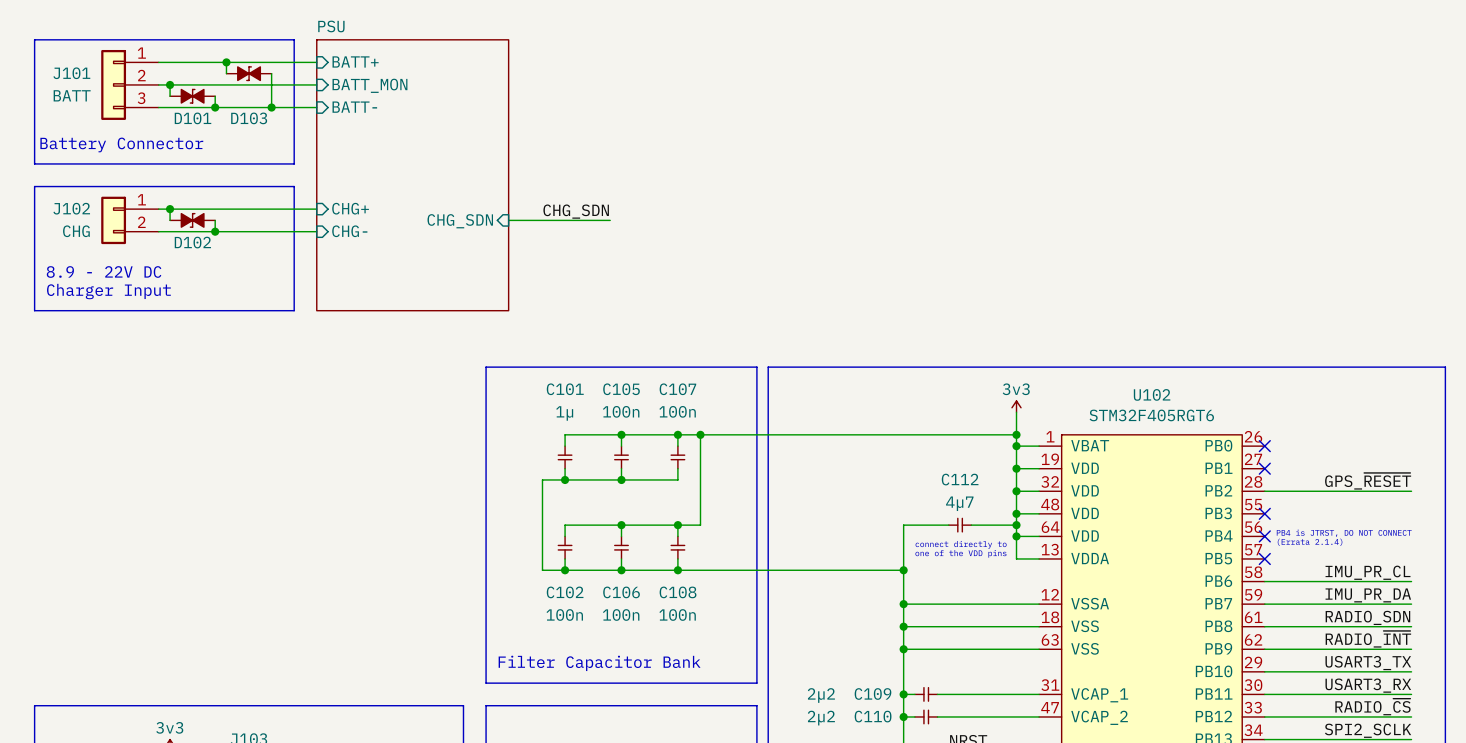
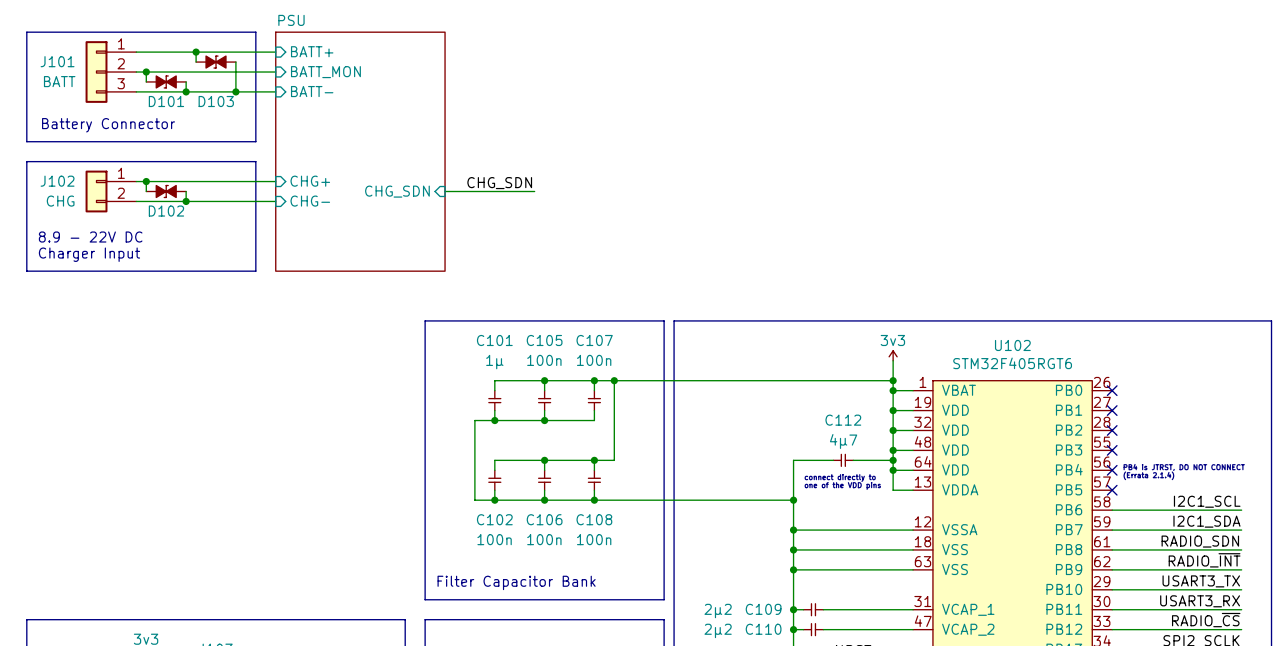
label: GPS_~{RESET} (1368, 481) -> none
wire: (1264, 491) (1411, 491) -> none
no-connect mark: none -> (1112, 430)
label: IMU_PR_CL (1368, 572) -> I2C1_SCL (1207, 501)
label: IMU_PR_DA (1368, 595) -> I2C1_SDA (1206, 521)

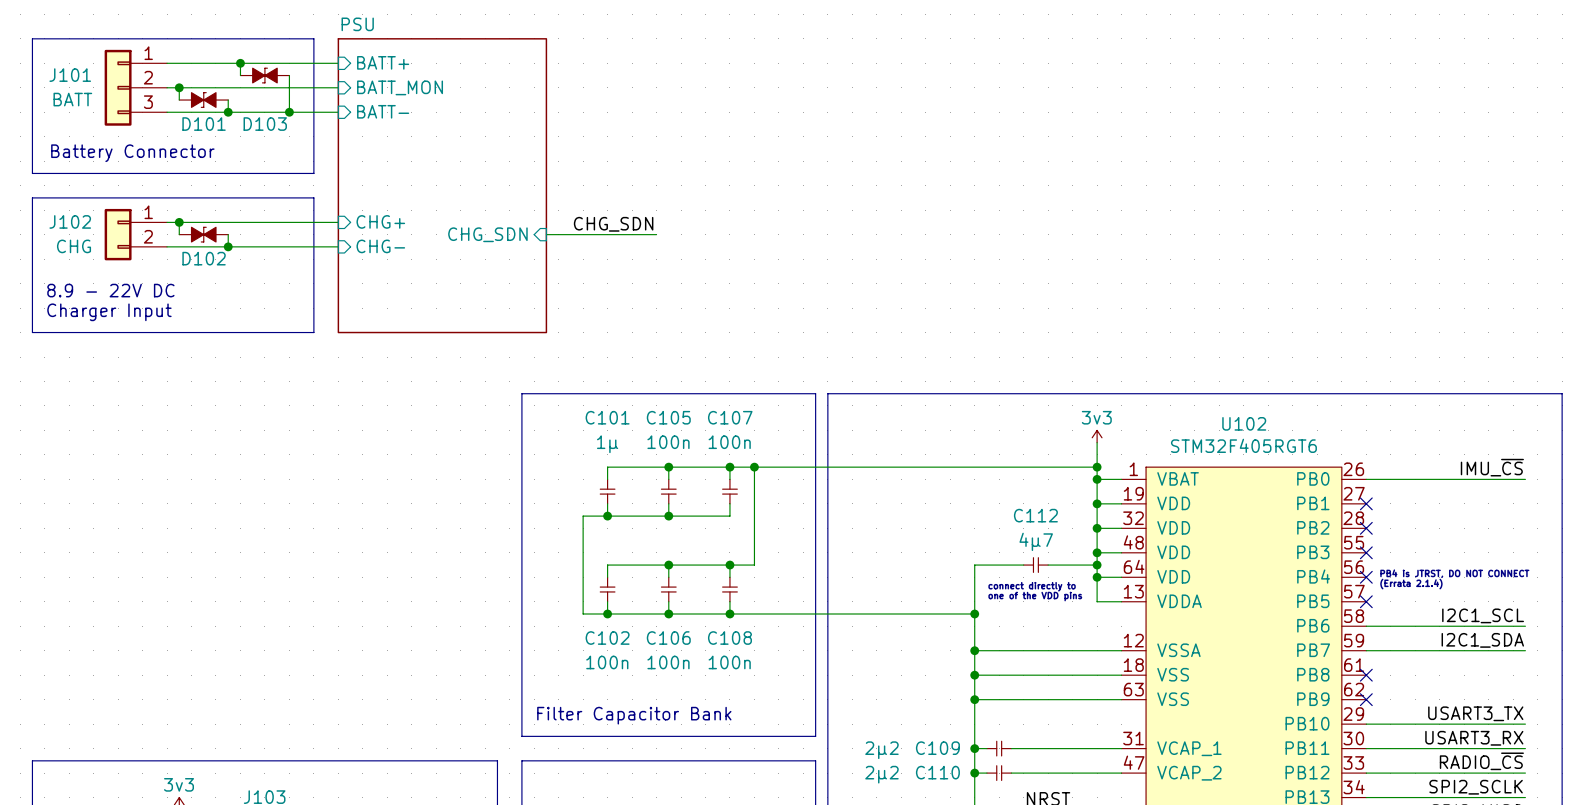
label: none -> IMU_~{CS} (1492, 467)
no-connect mark: (1112, 390) -> none
label: RADIO_SDN (1200, 541) -> none
wire: (1112, 549) (1241, 549) -> (1366, 479) (1525, 479)
no-connect mark: none -> (1366, 675)
label: RADIO_~{INT} (1204, 560) -> none
wire: (1112, 569) (1241, 569) -> none
no-connect mark: none -> (1366, 699)

